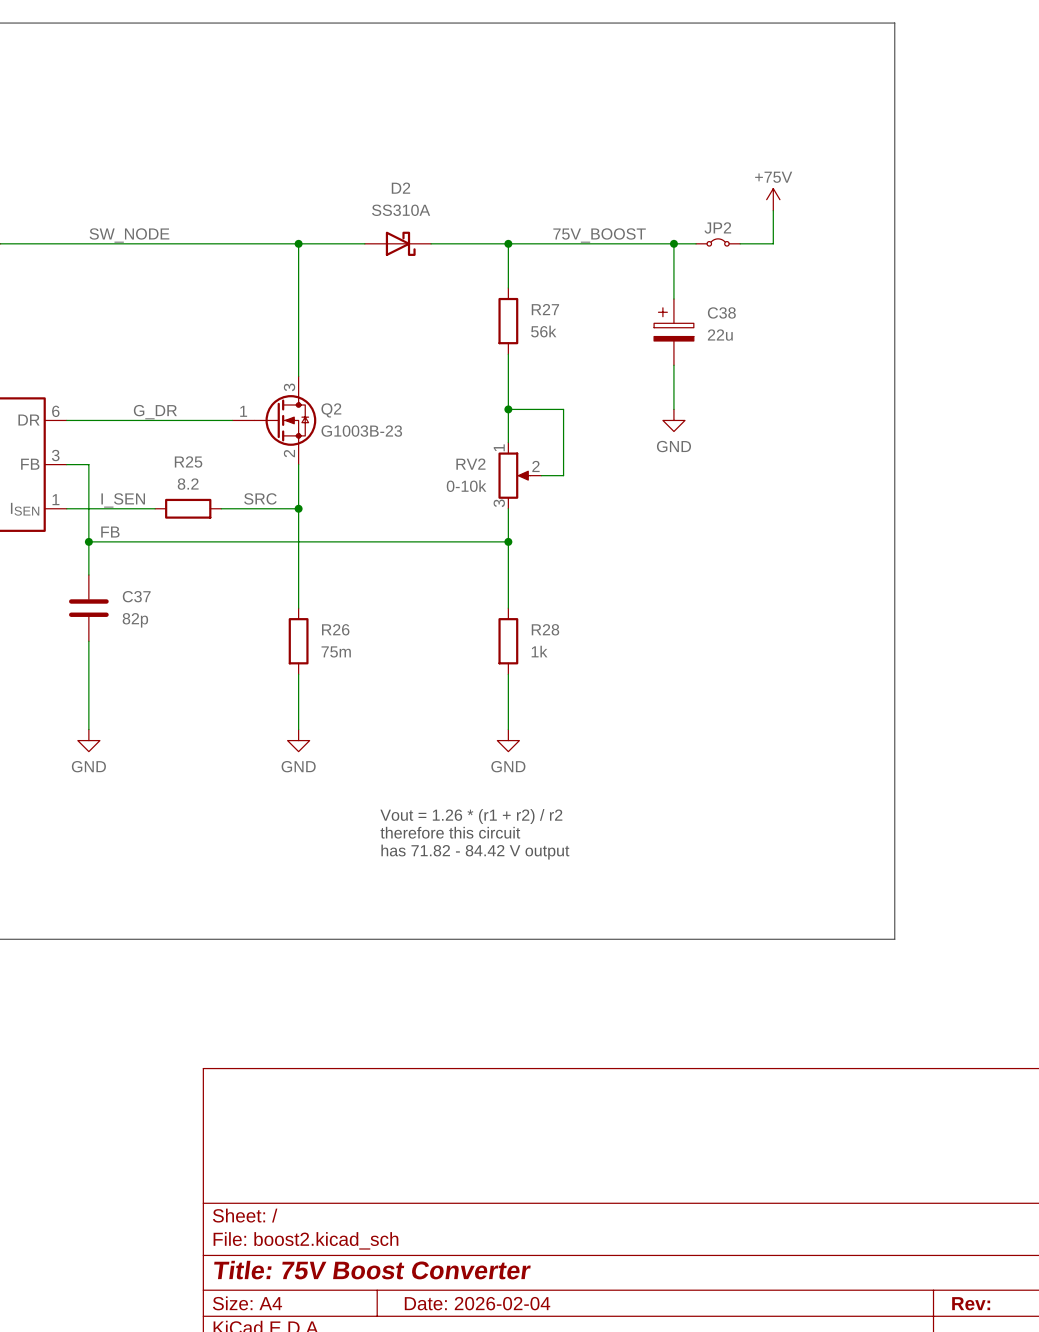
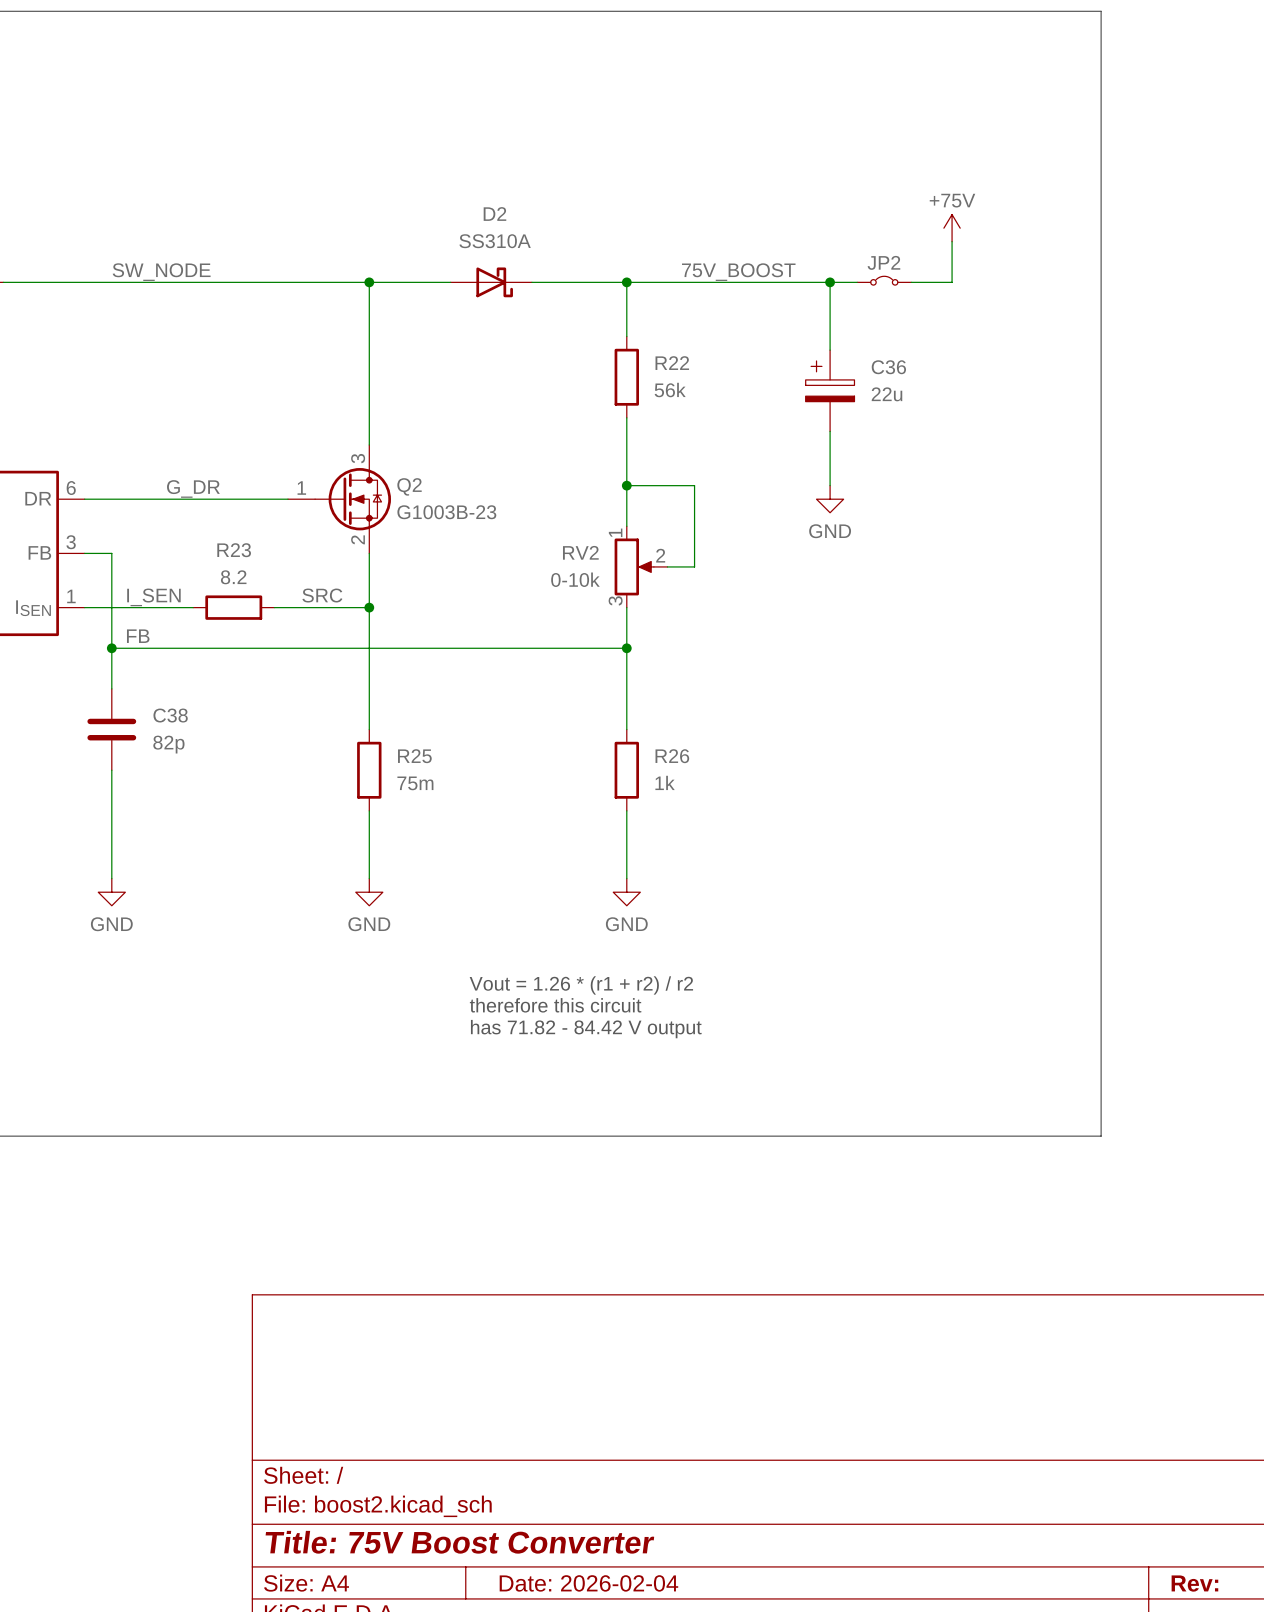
R27 name: R27 (545, 309) -> R22 (672, 363)
C38 name: C38 (721, 312) -> C36 (888, 367)
R25 name: R25 (188, 461) -> R23 (234, 550)
C37 name: C37 (136, 596) -> C38 (170, 715)
R26 name: R26 (335, 629) -> R25 (414, 756)
R28 name: R28 (545, 629) -> R26 (672, 756)

